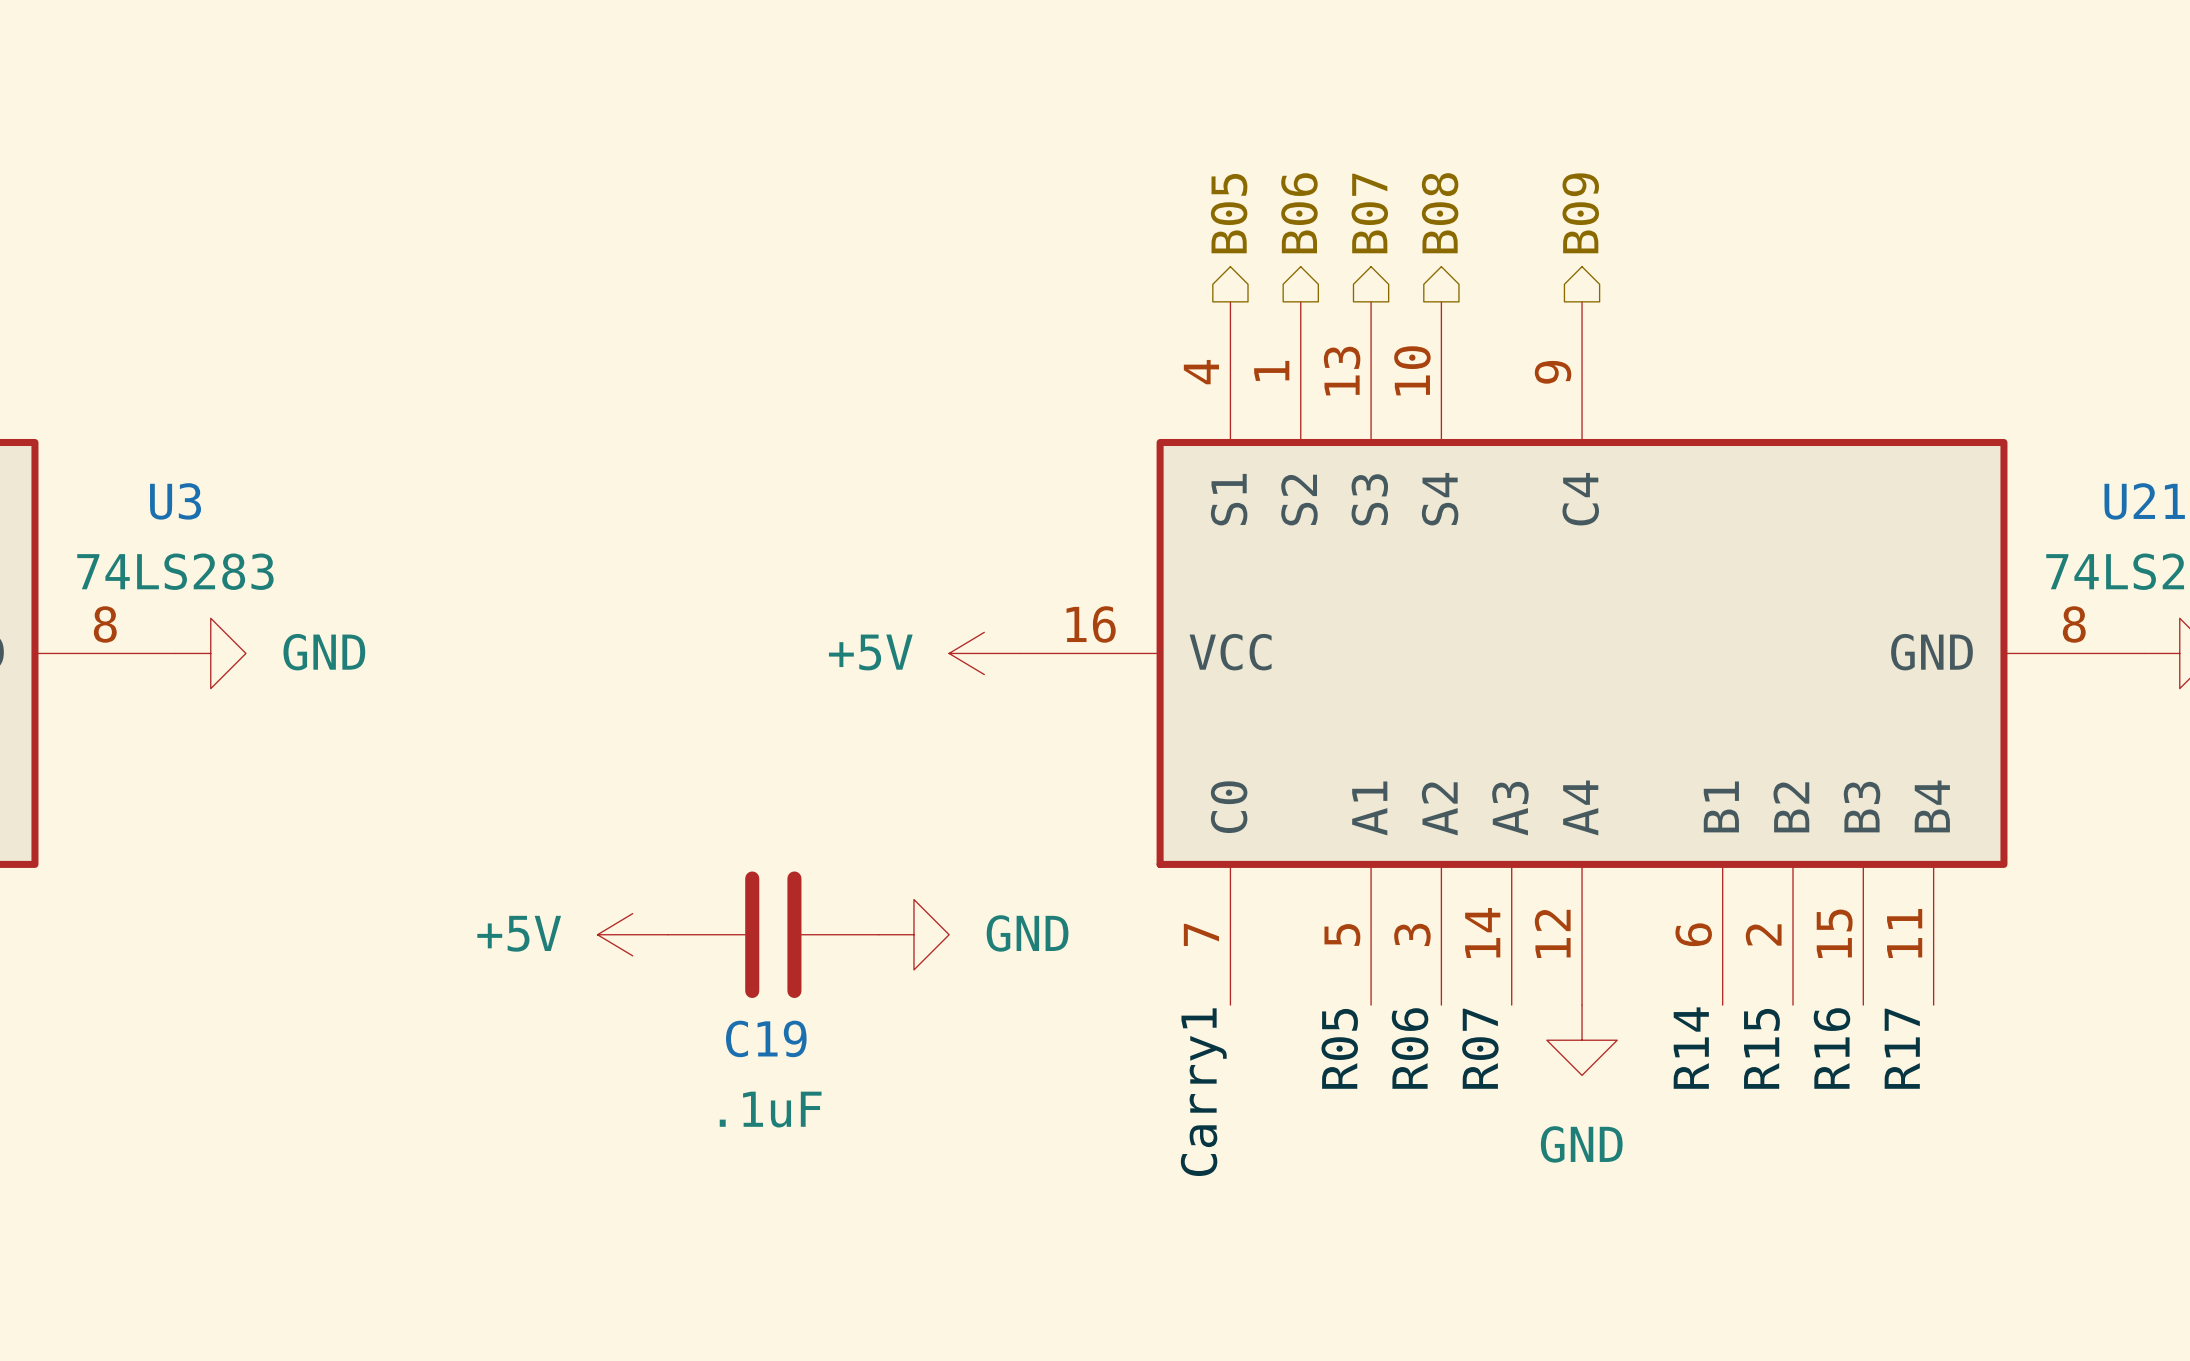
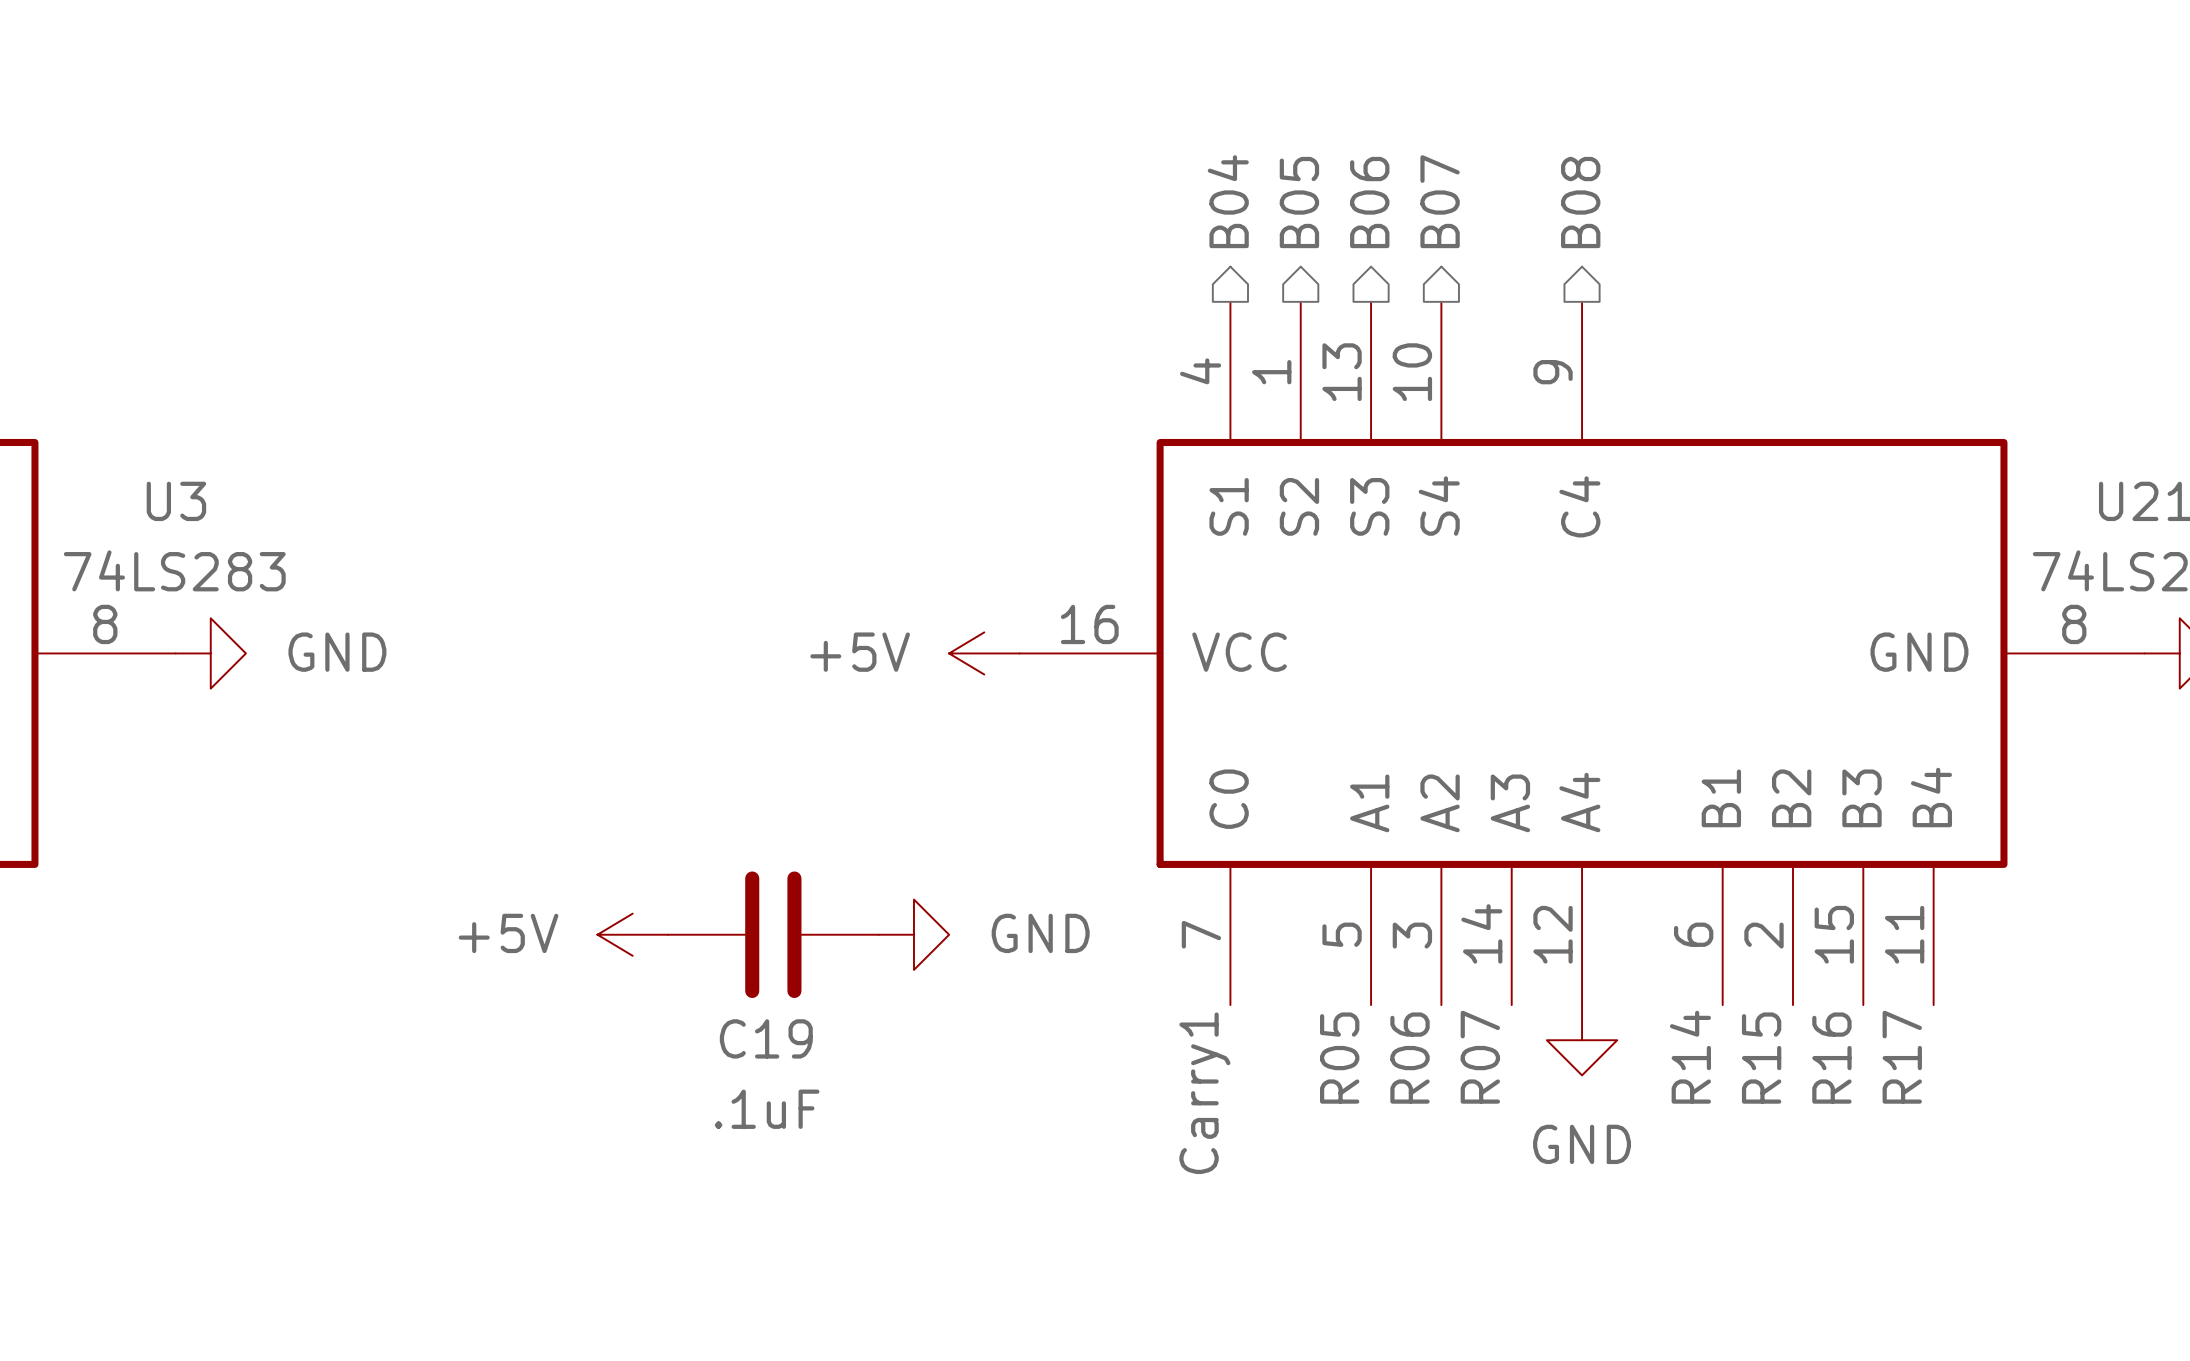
hierarchical label: B05 (1229, 213) -> B04 (1228, 201)
hierarchical label: B06 (1299, 213) -> B05 (1299, 202)
hierarchical label: B07 (1369, 213) -> B06 (1369, 202)
hierarchical label: B08 (1440, 213) -> B07 (1440, 201)
hierarchical label: B09 (1580, 213) -> B08 (1580, 202)

